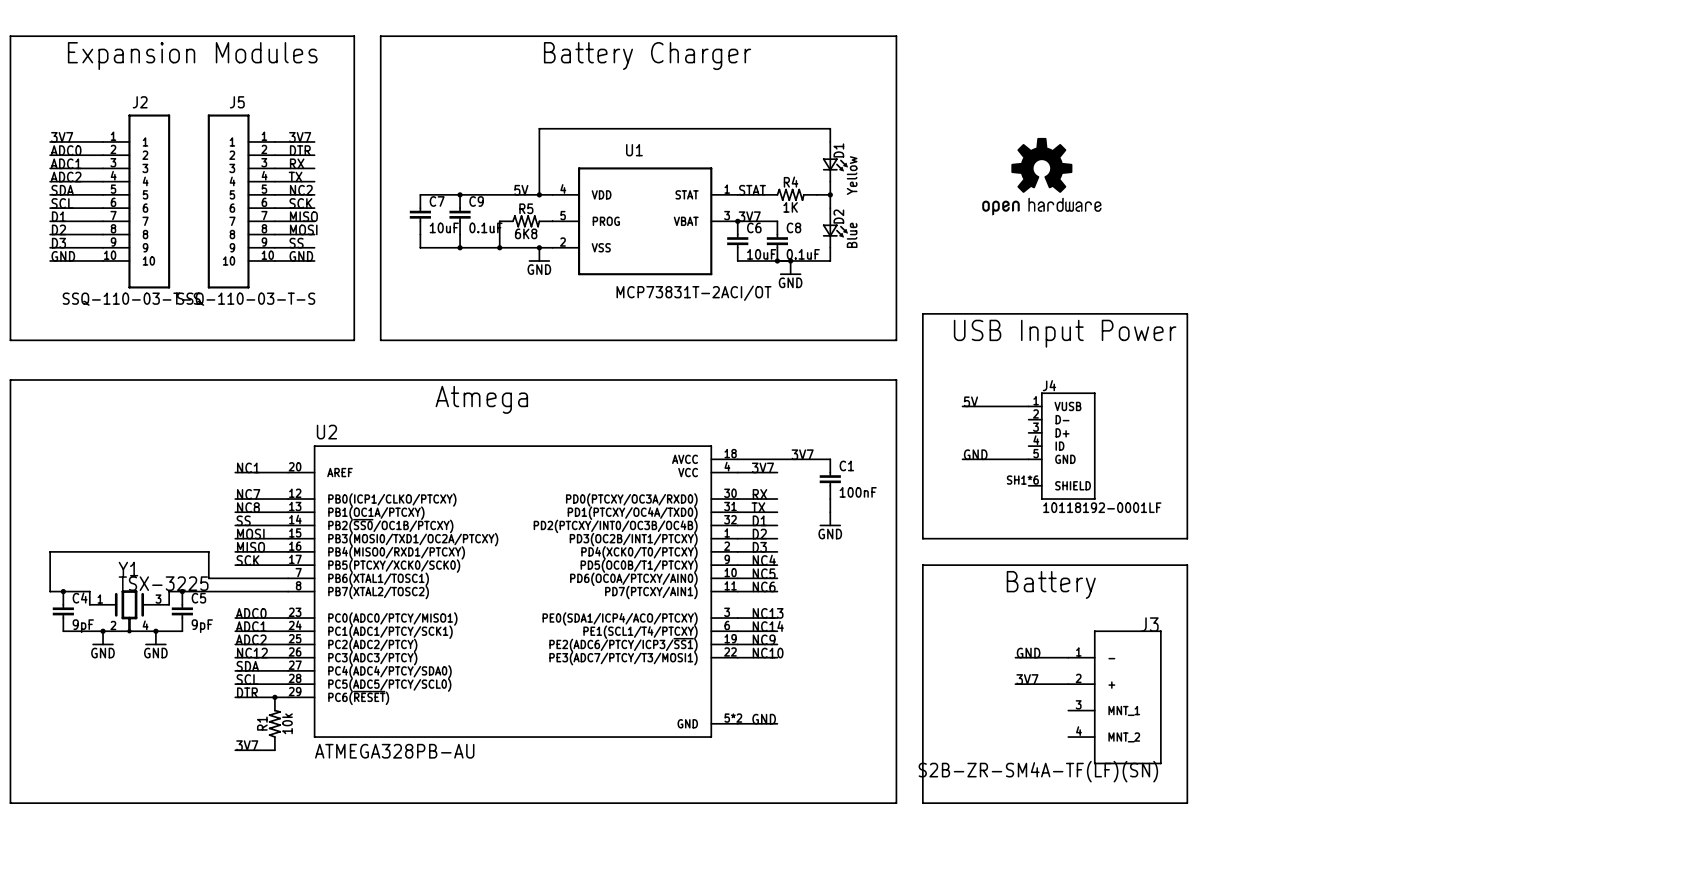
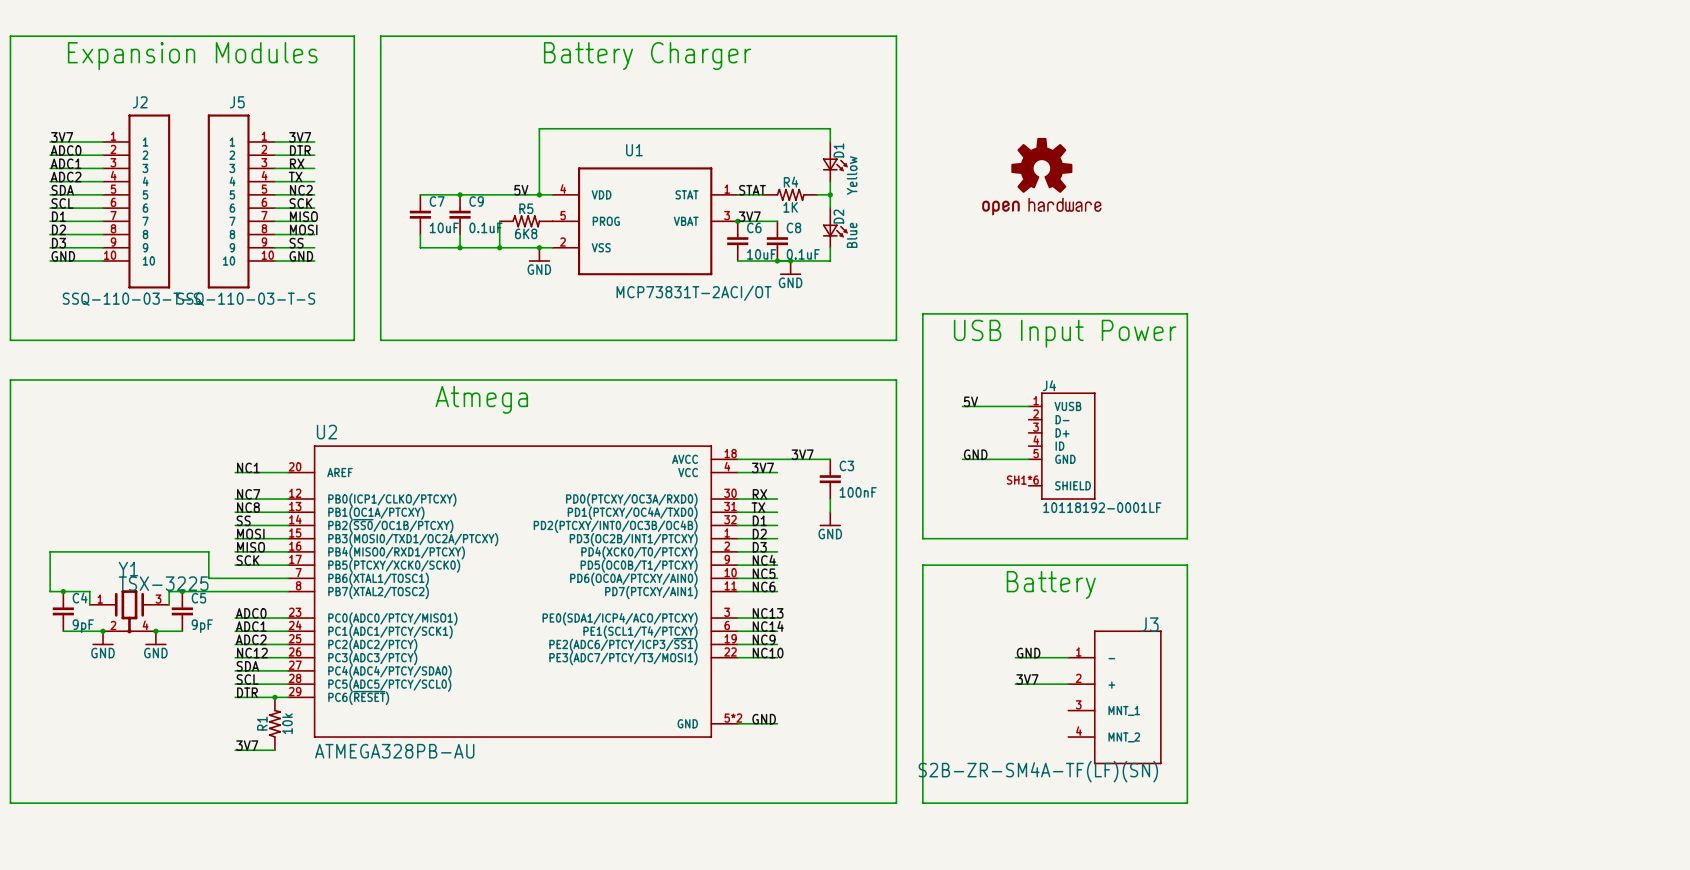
C1 name: C1 (846, 465) -> C3 (846, 465)

